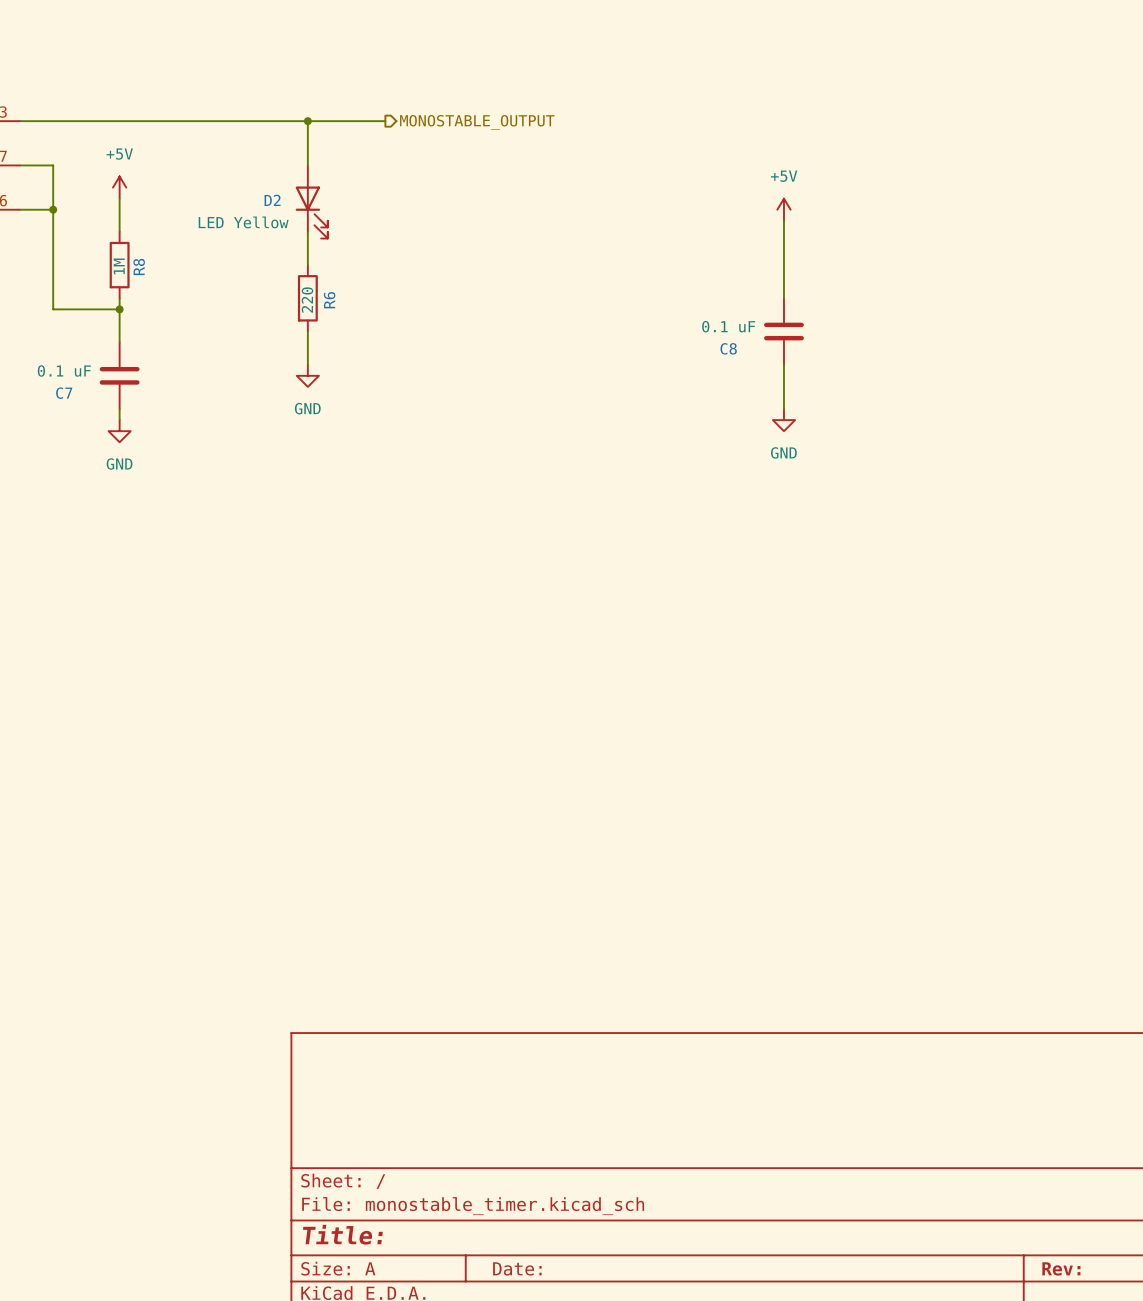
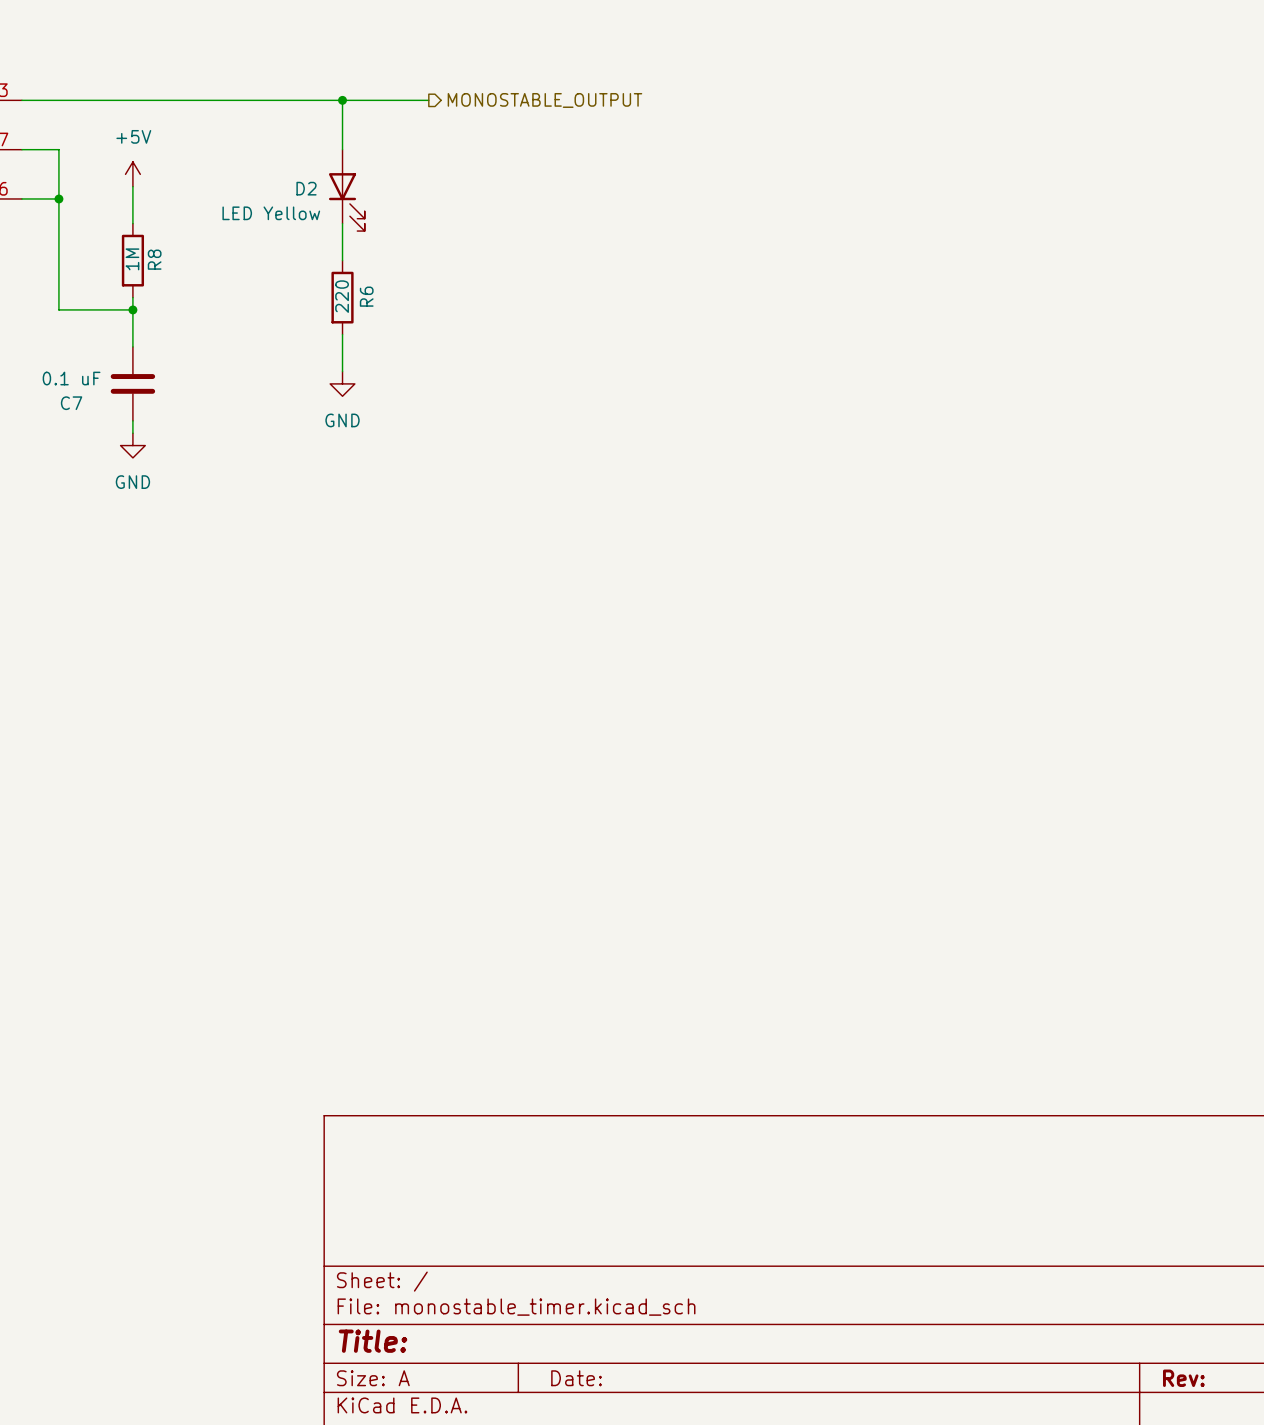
power symbol: +5V (783, 209) -> none
wire: (783, 220) (783, 298) -> none
C8: 0.1 uF (783, 331) -> none
wire: (783, 364) (783, 409) -> none
power symbol: GND (783, 420) -> none

